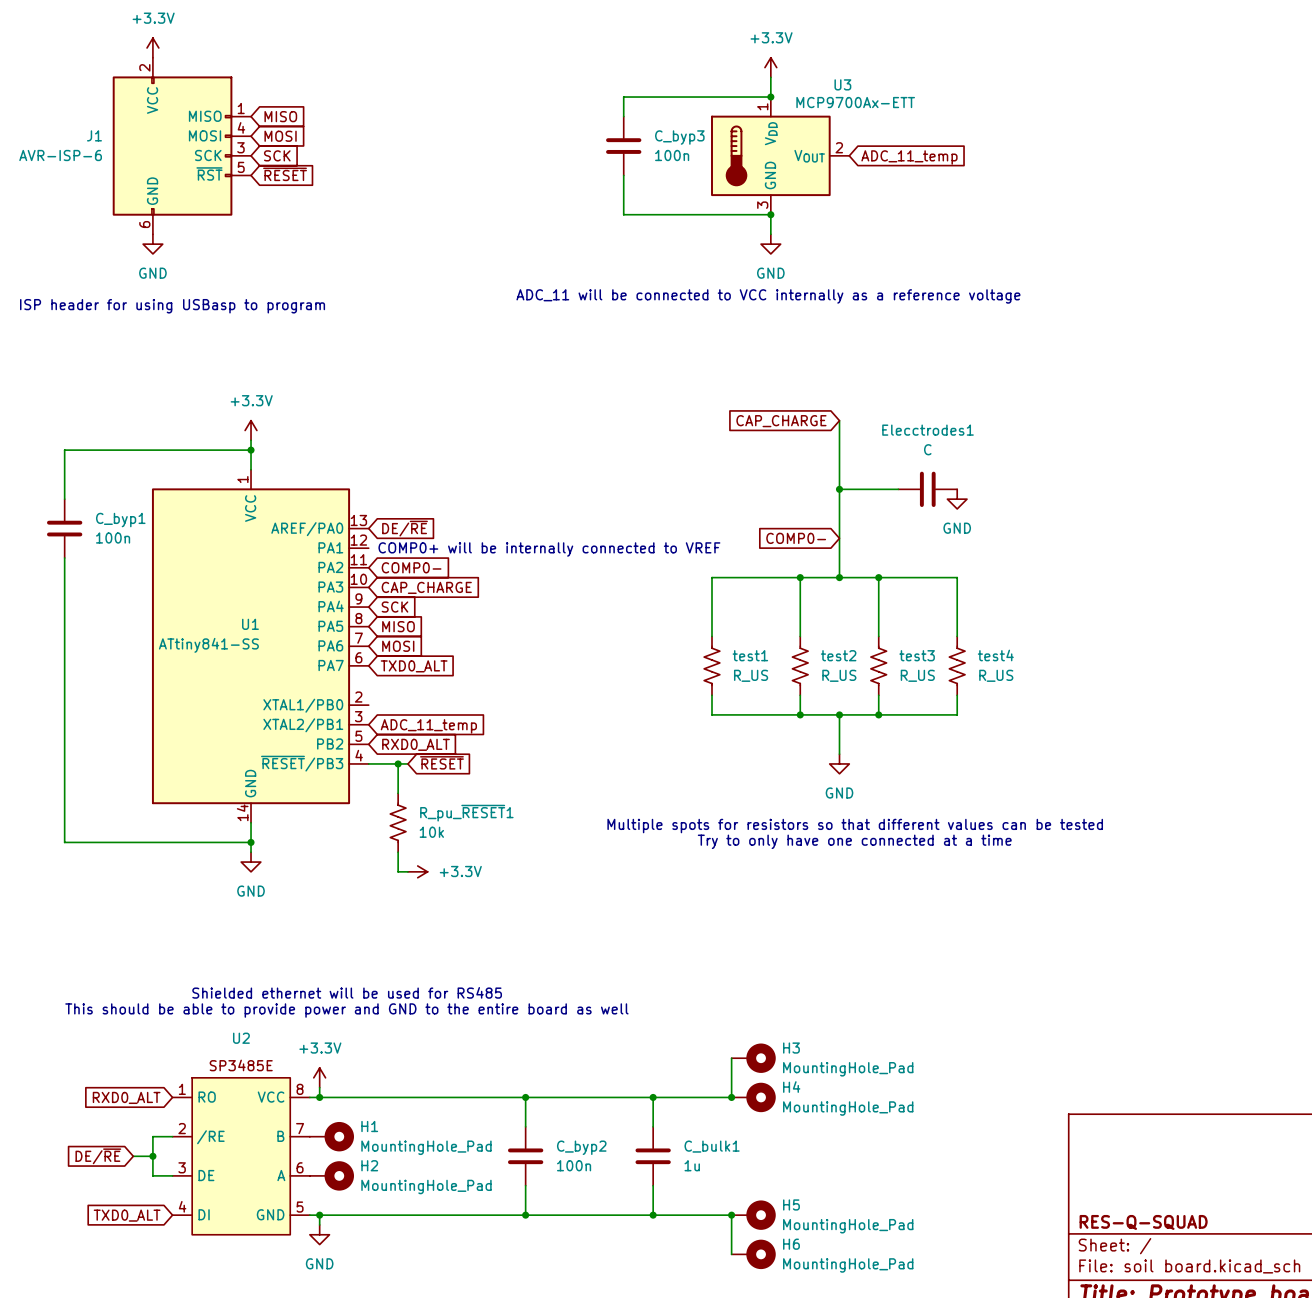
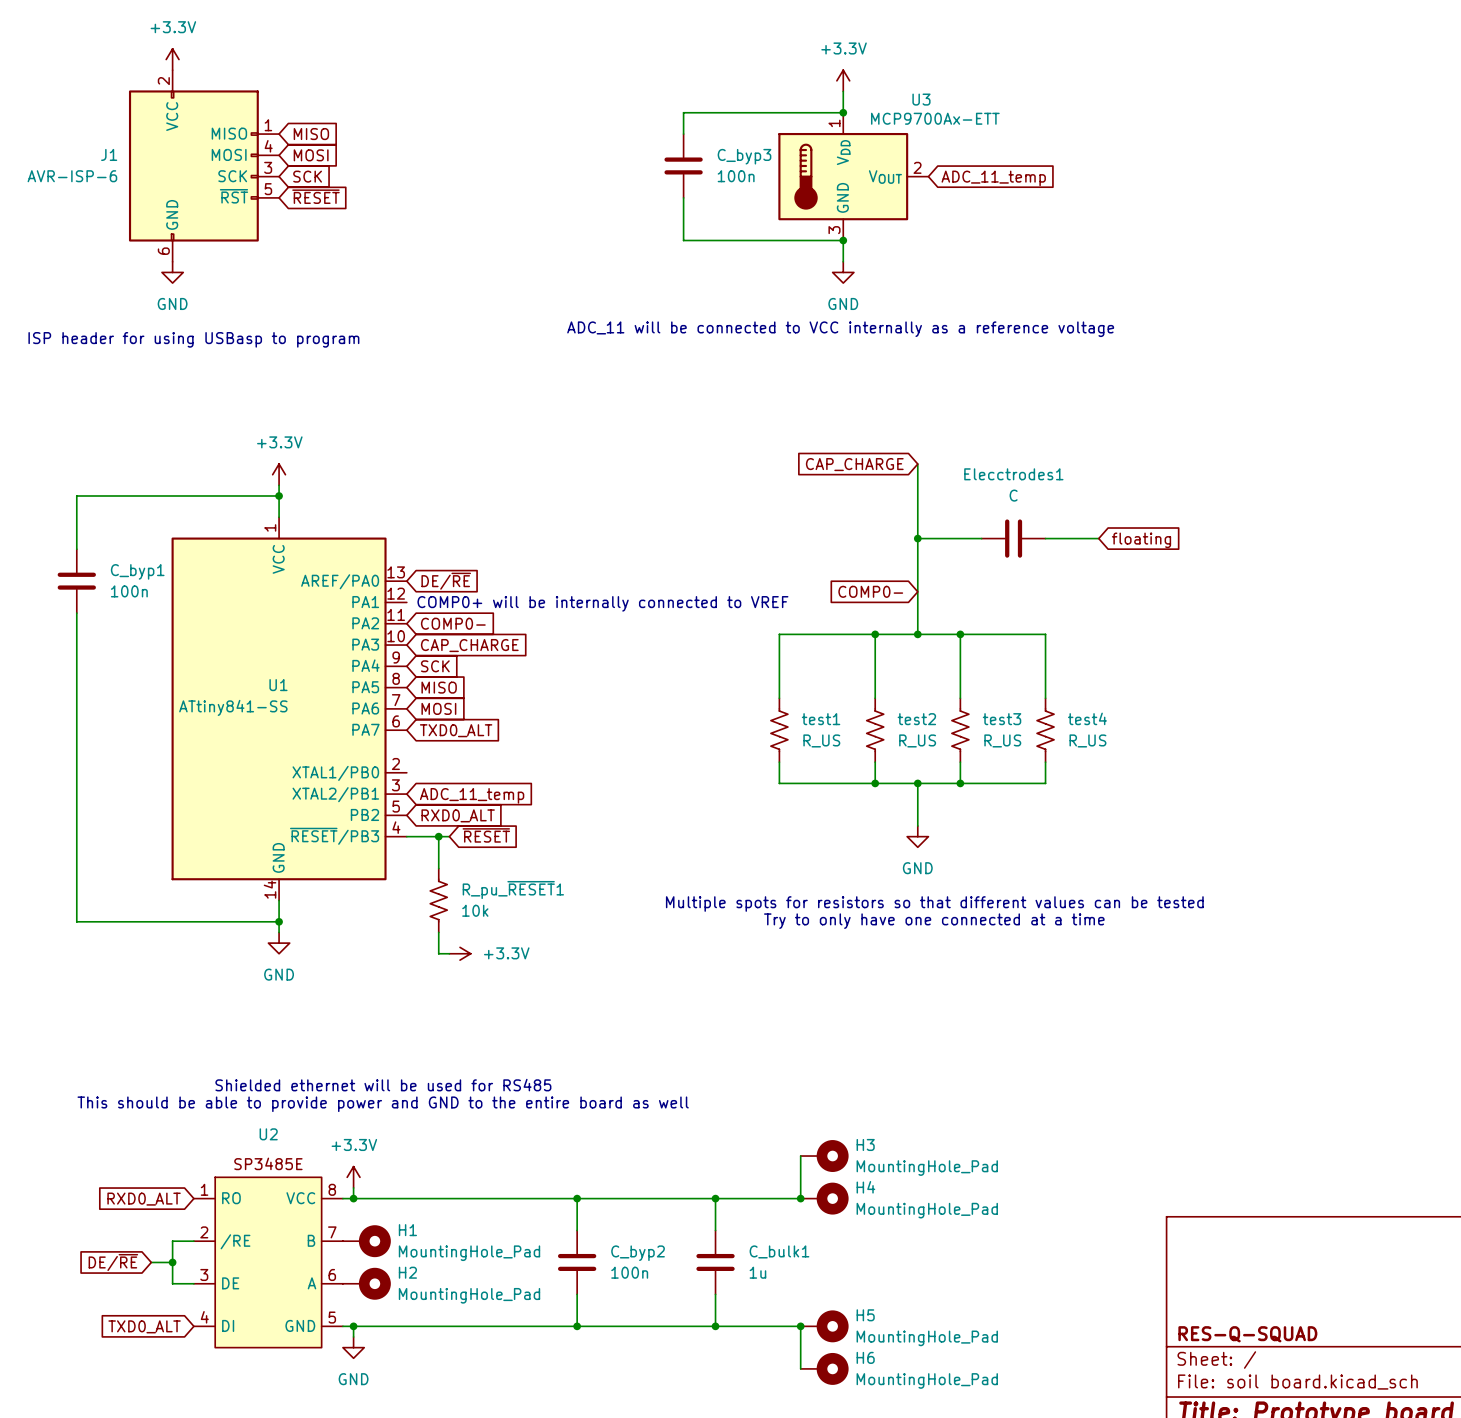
wire: none -> (1045, 538) (1098, 538)
global label: none -> floating (1141, 540)
power symbol: GND (957, 499) -> none

